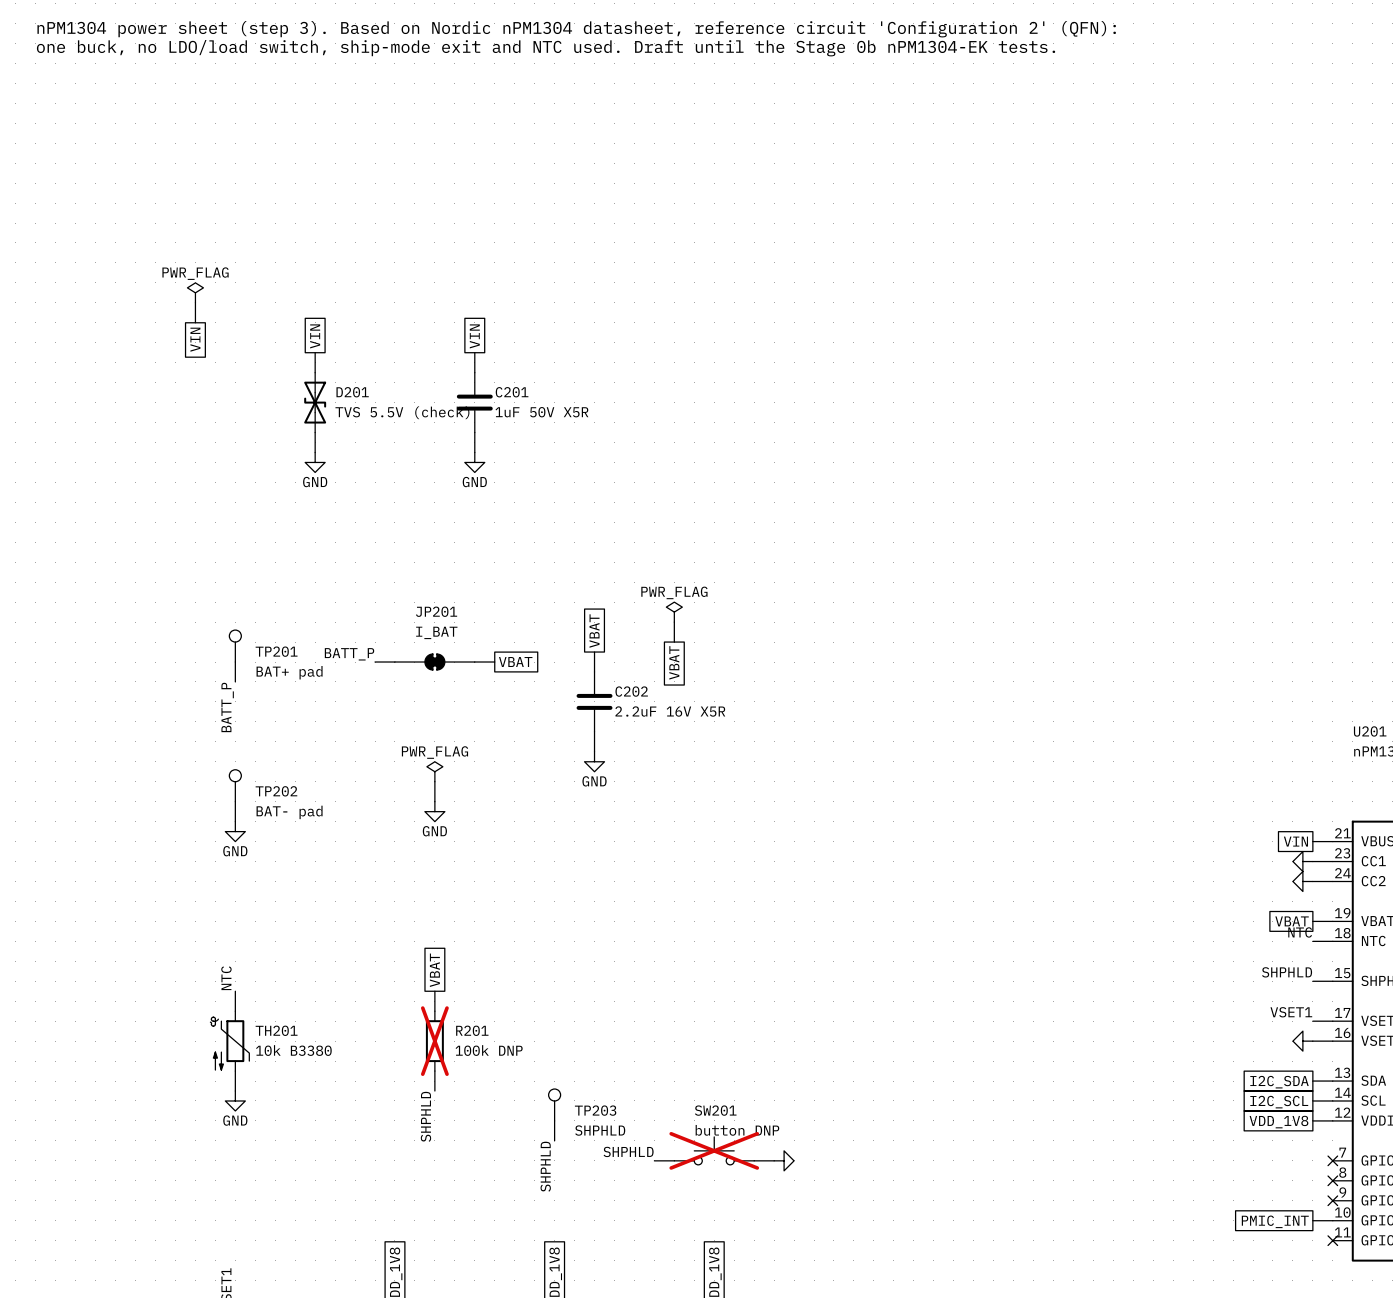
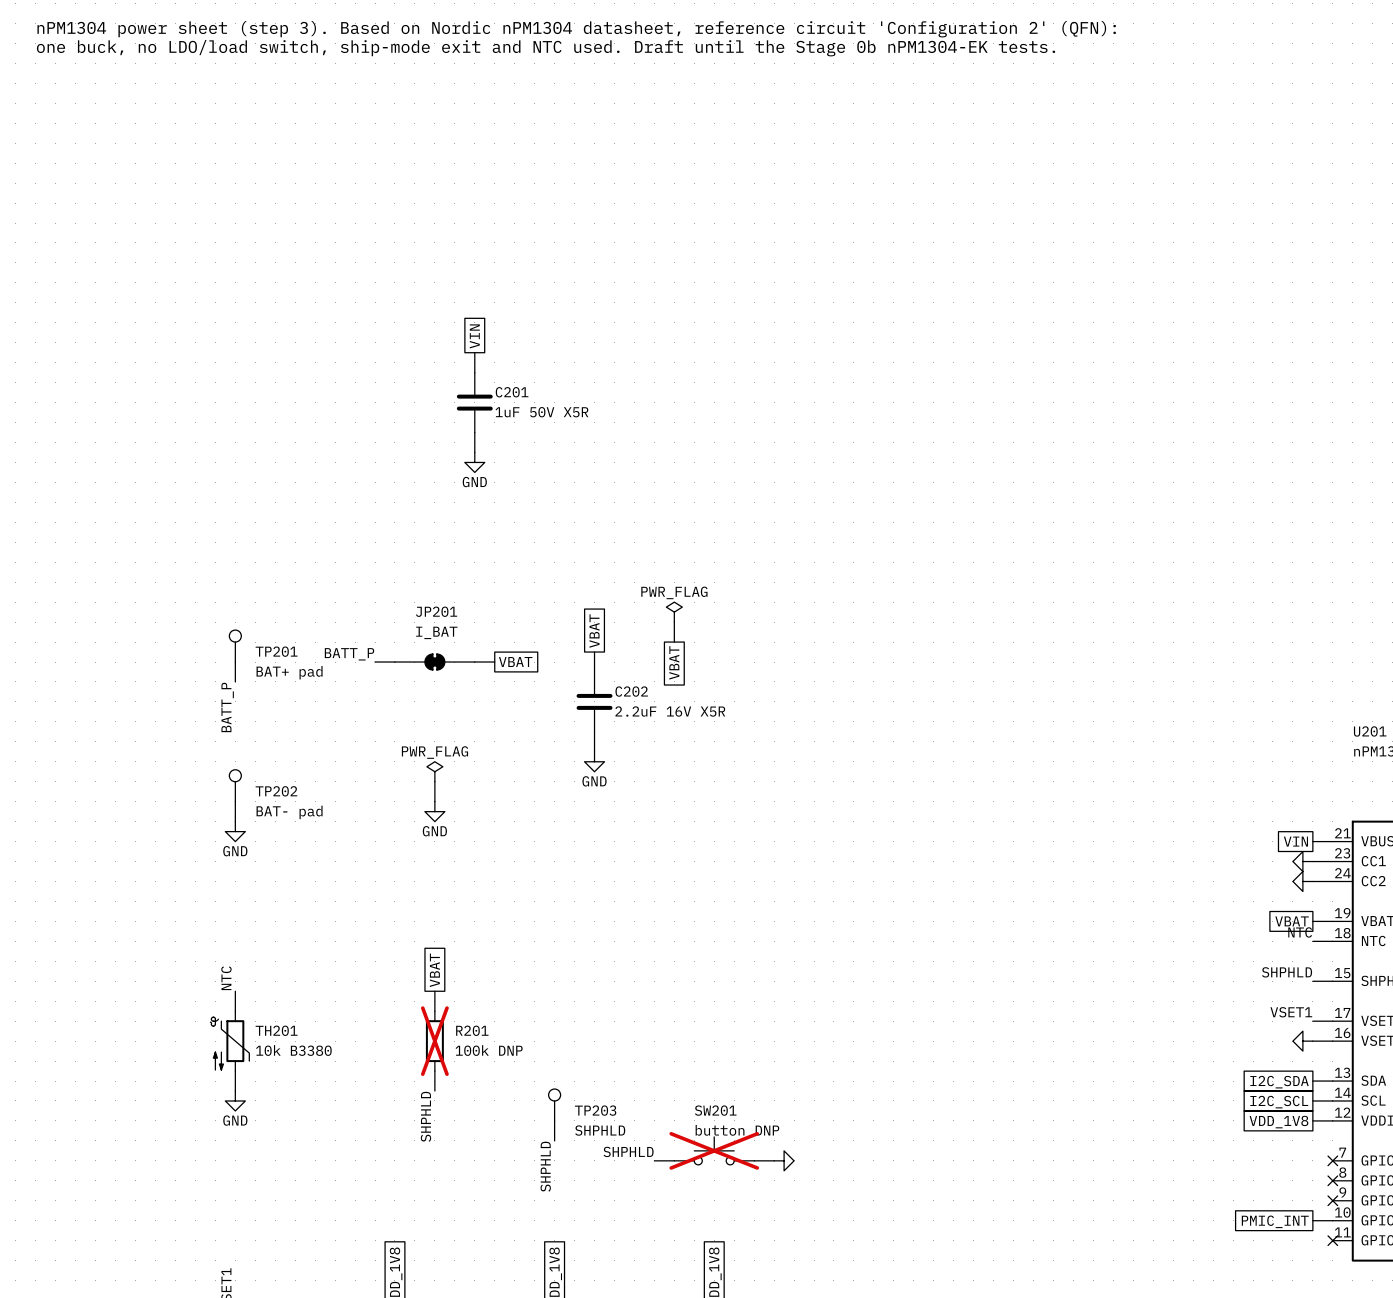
power symbol: PWR_FLAG (195, 292) -> none
wire: (195, 302) (195, 322) -> none
global label: VIN (315, 336) -> none
global label: VIN (195, 339) -> none
wire: (315, 352) (315, 372) -> none
D201: TVS 5.5V (check) (315, 402) -> none
wire: (315, 432) (315, 452) -> none
power symbol: GND (315, 462) -> none

